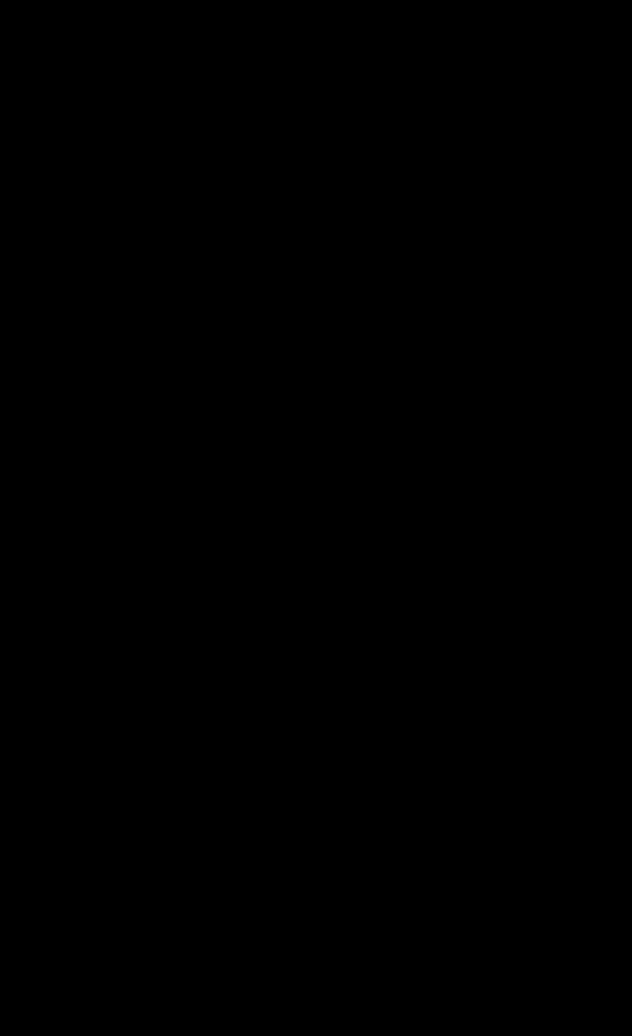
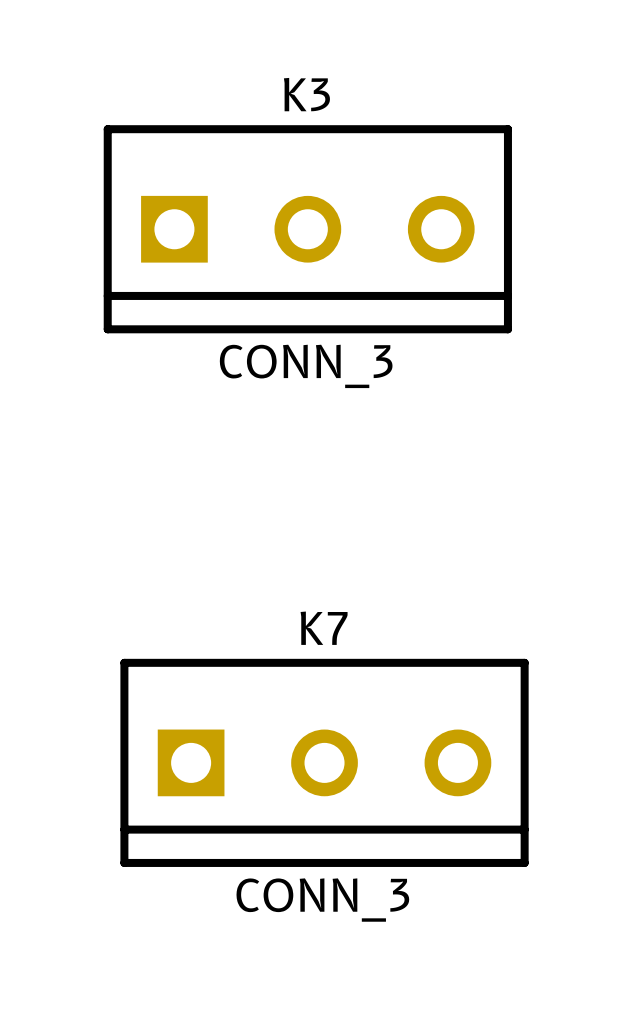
K3: none -> CONN_3 (307, 229)
K7: none -> CONN_3 (324, 762)

